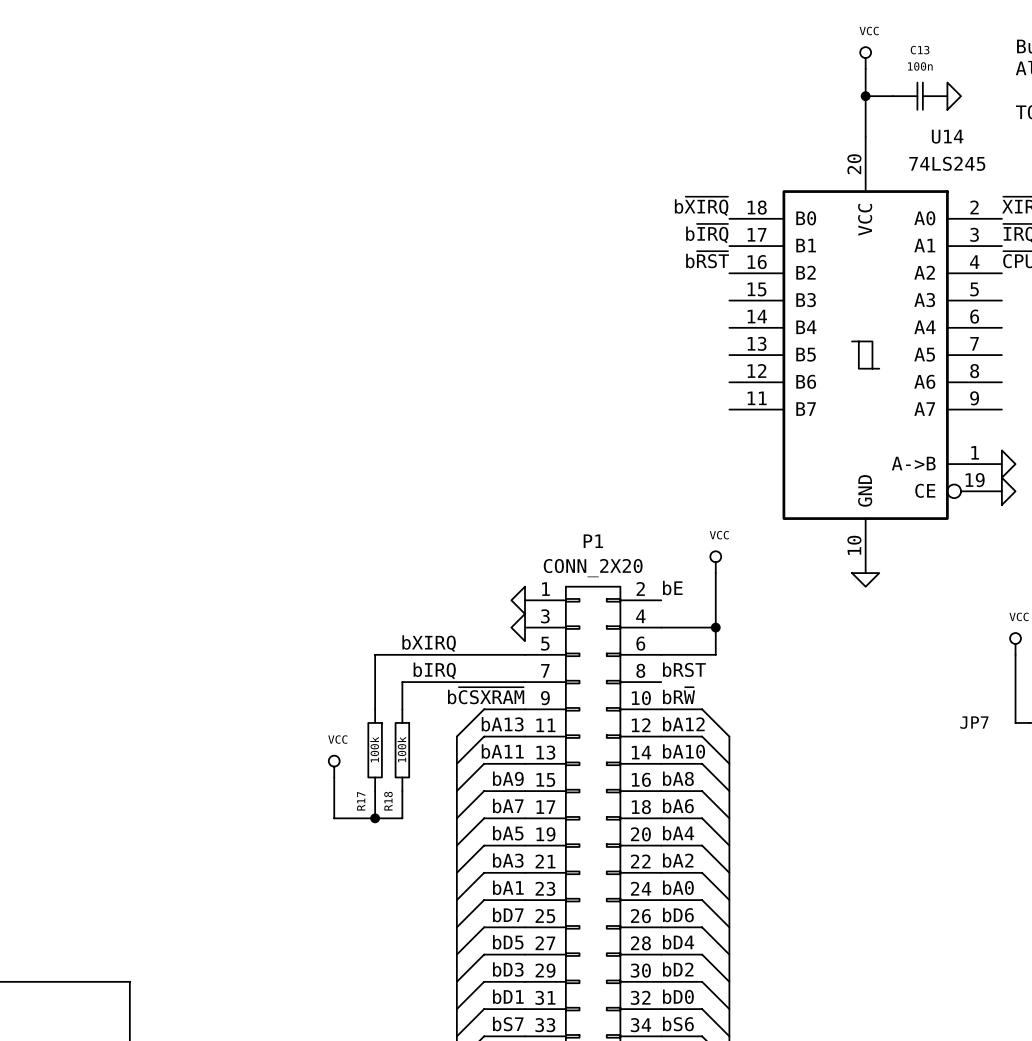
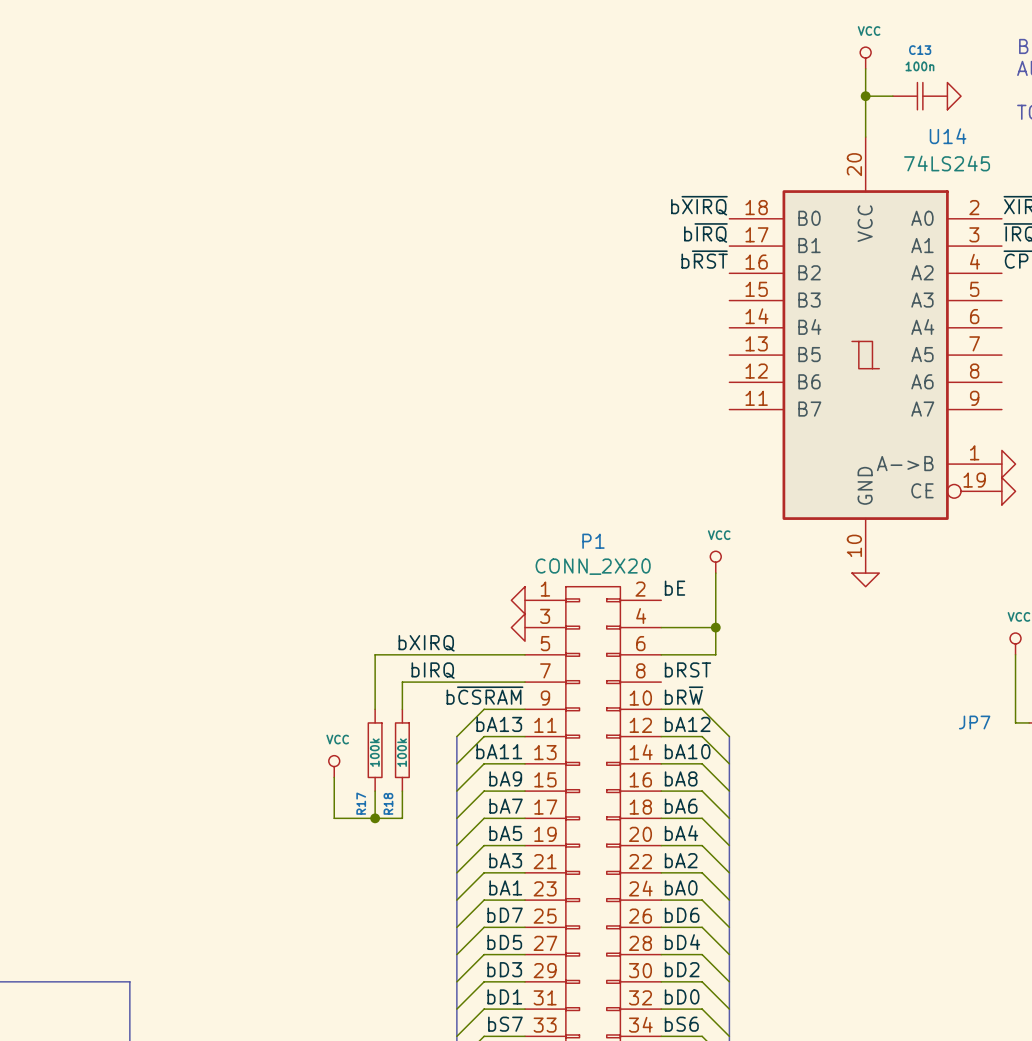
label: b~{CSXRAM} (486, 695) -> b~{CSRAM} (484, 695)

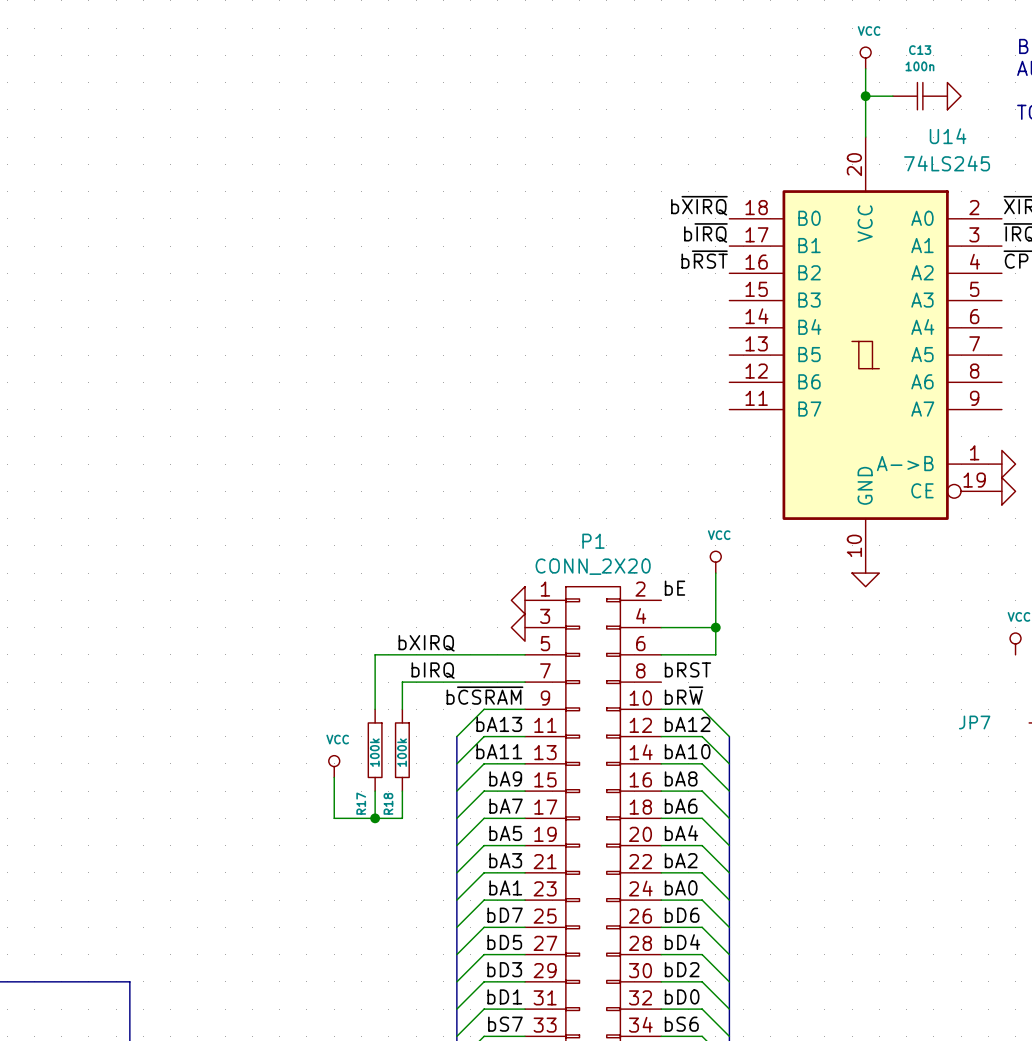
wire: (1015, 654) (1015, 722) (1029, 722) -> none

